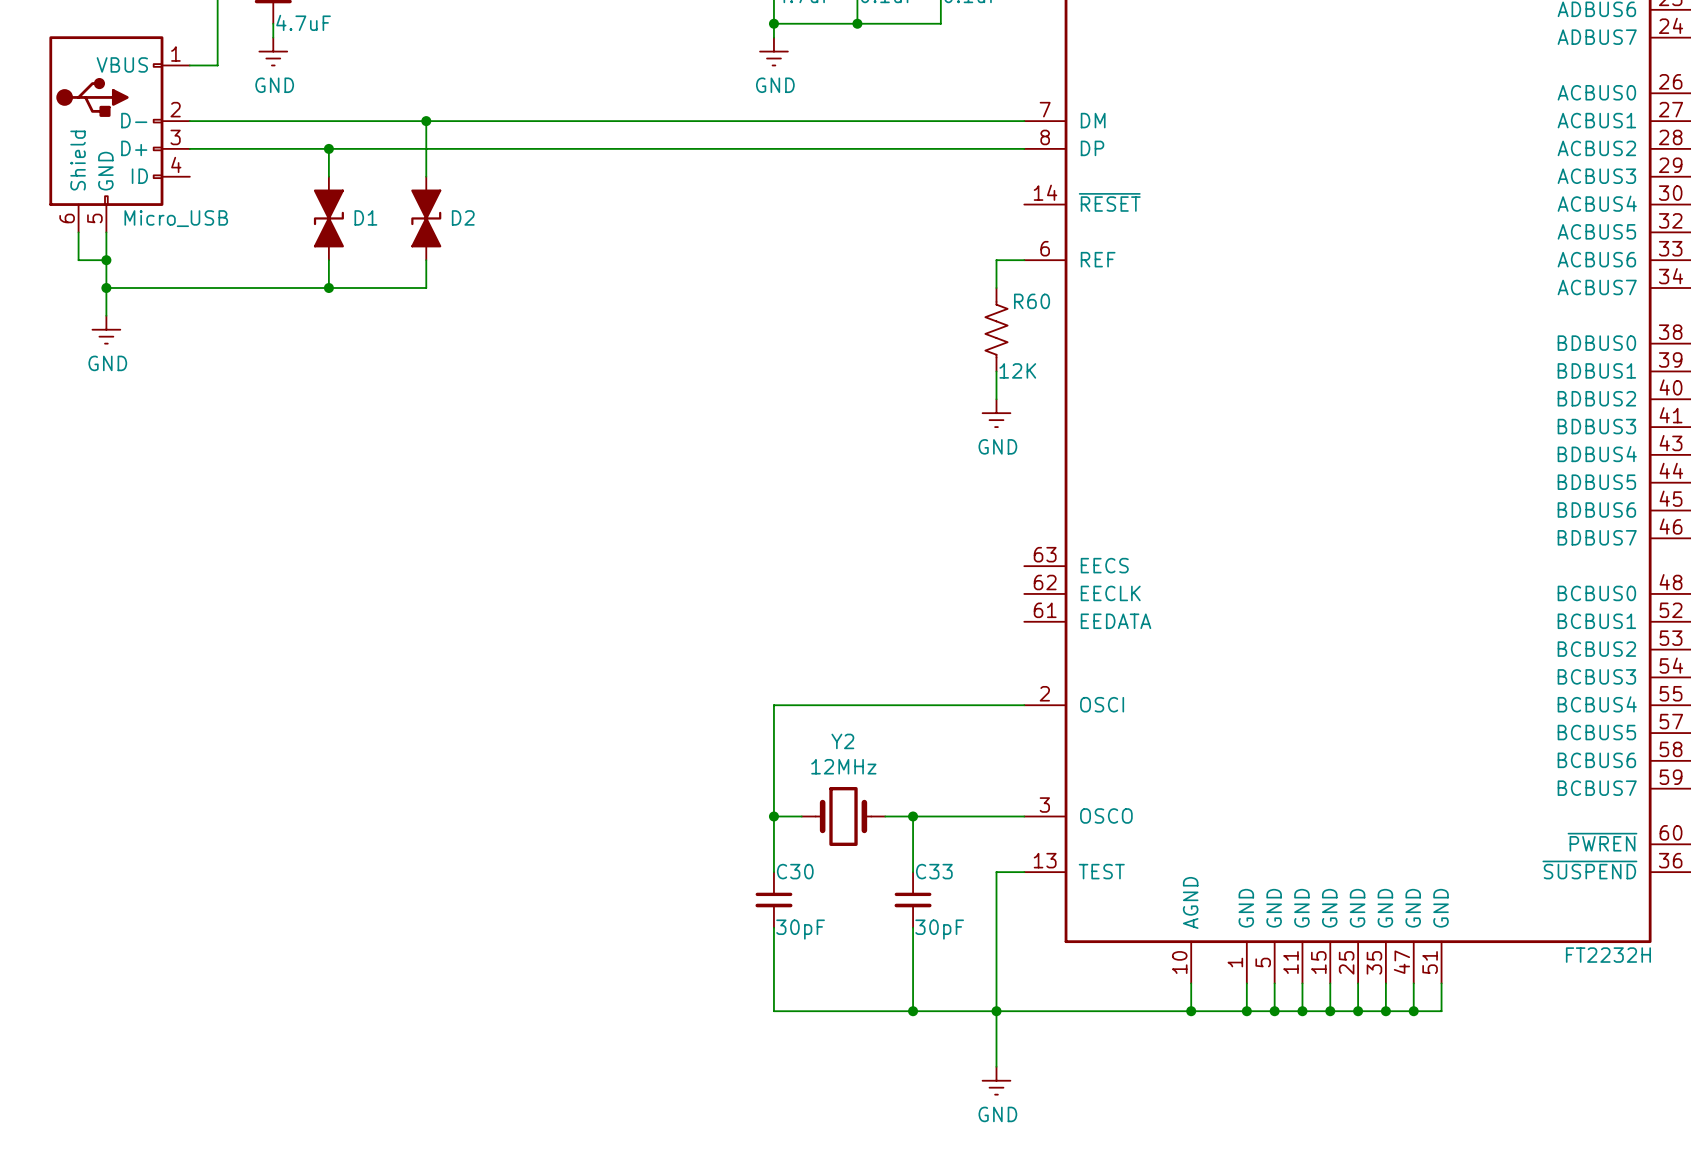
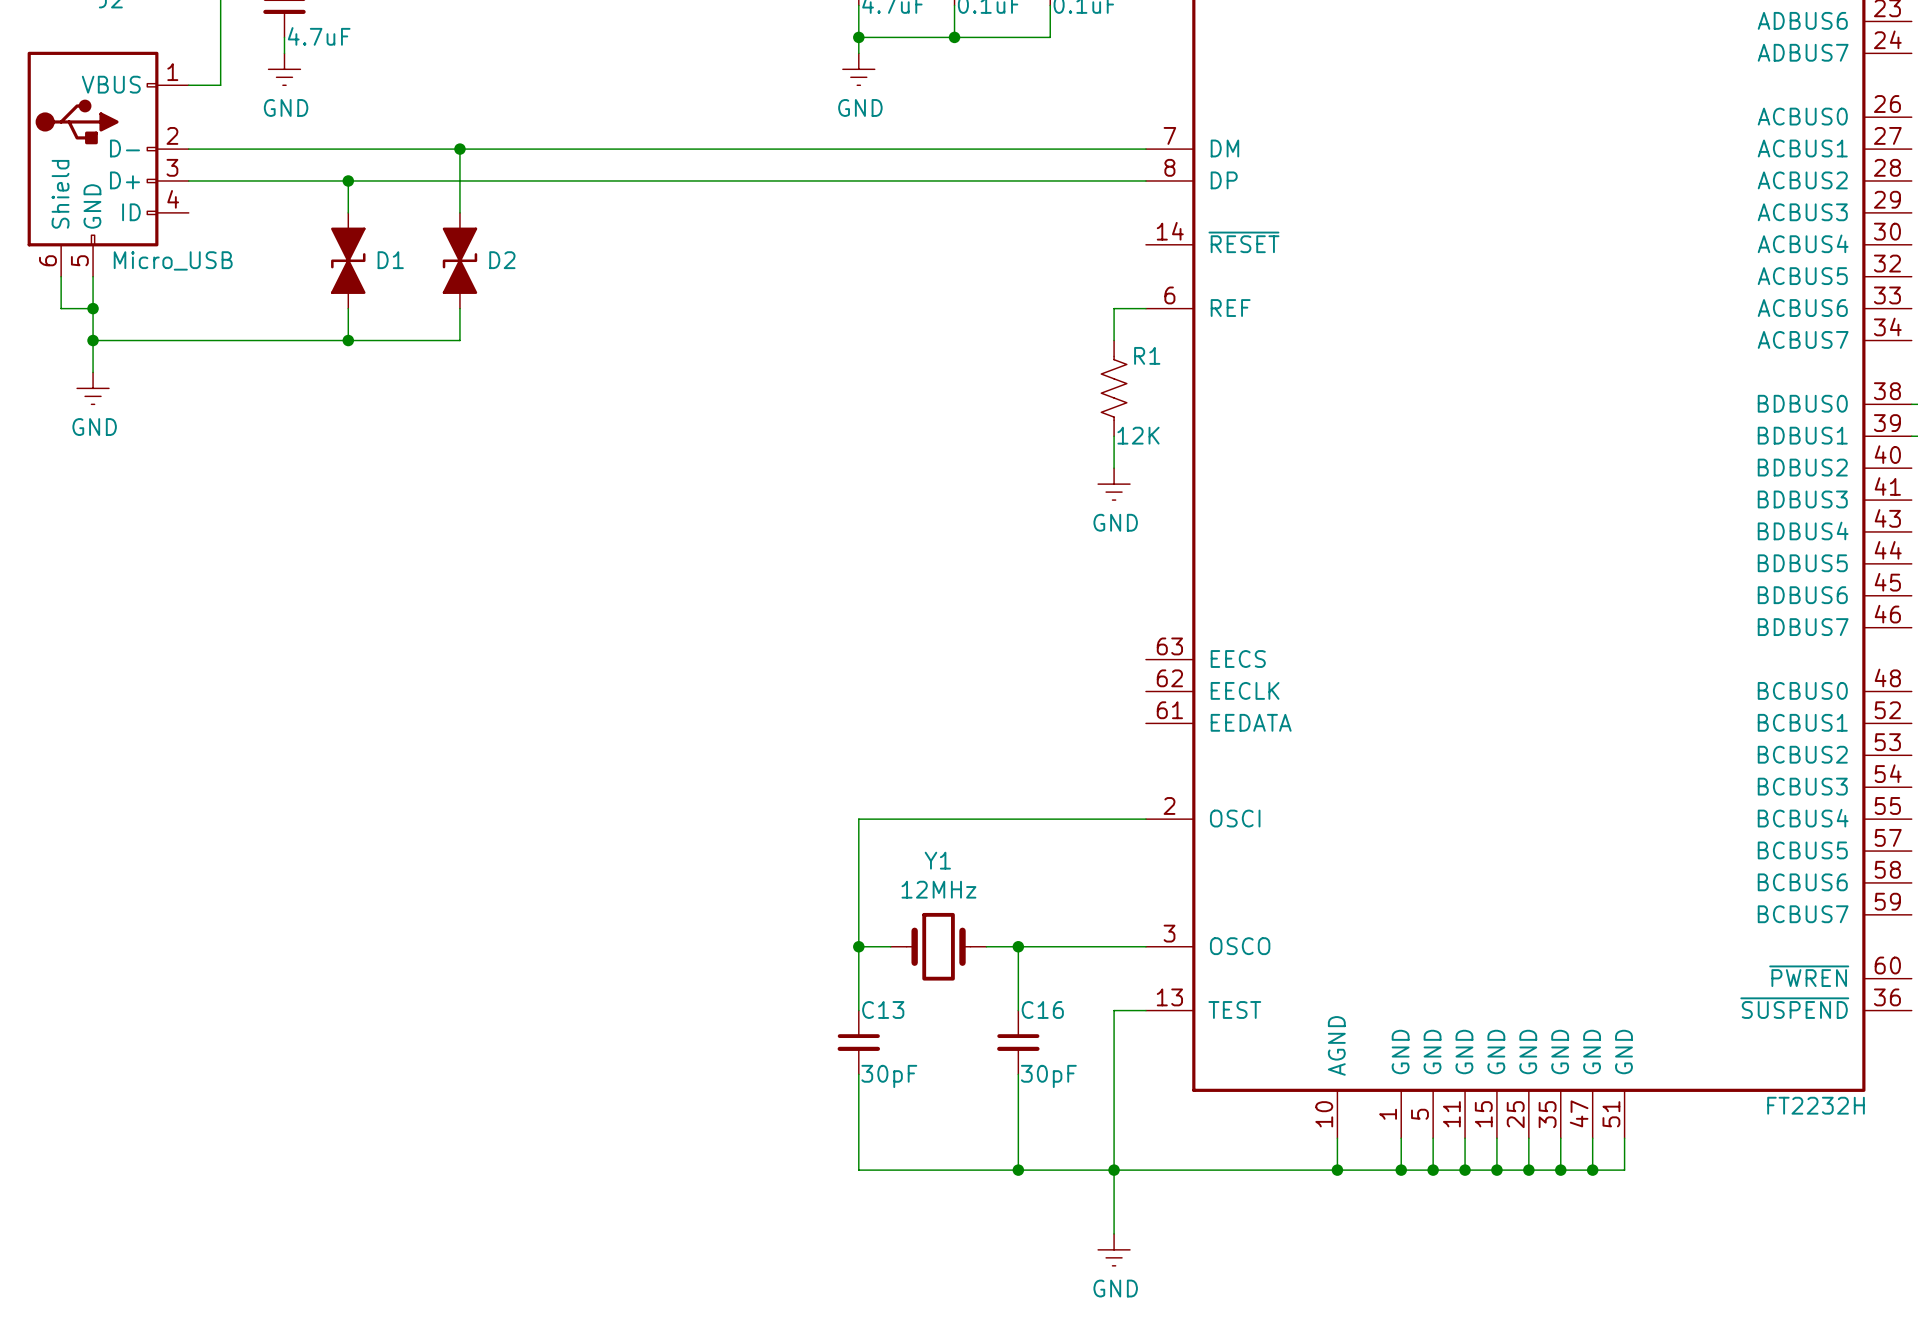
R60 name: R60 (1032, 301) -> R1 (1147, 355)
Y2 name: Y2 (842, 741) -> Y1 (937, 860)
C30 name: C30 (795, 871) -> C13 (883, 1009)
C33 name: C33 (934, 871) -> C16 (1042, 1009)

